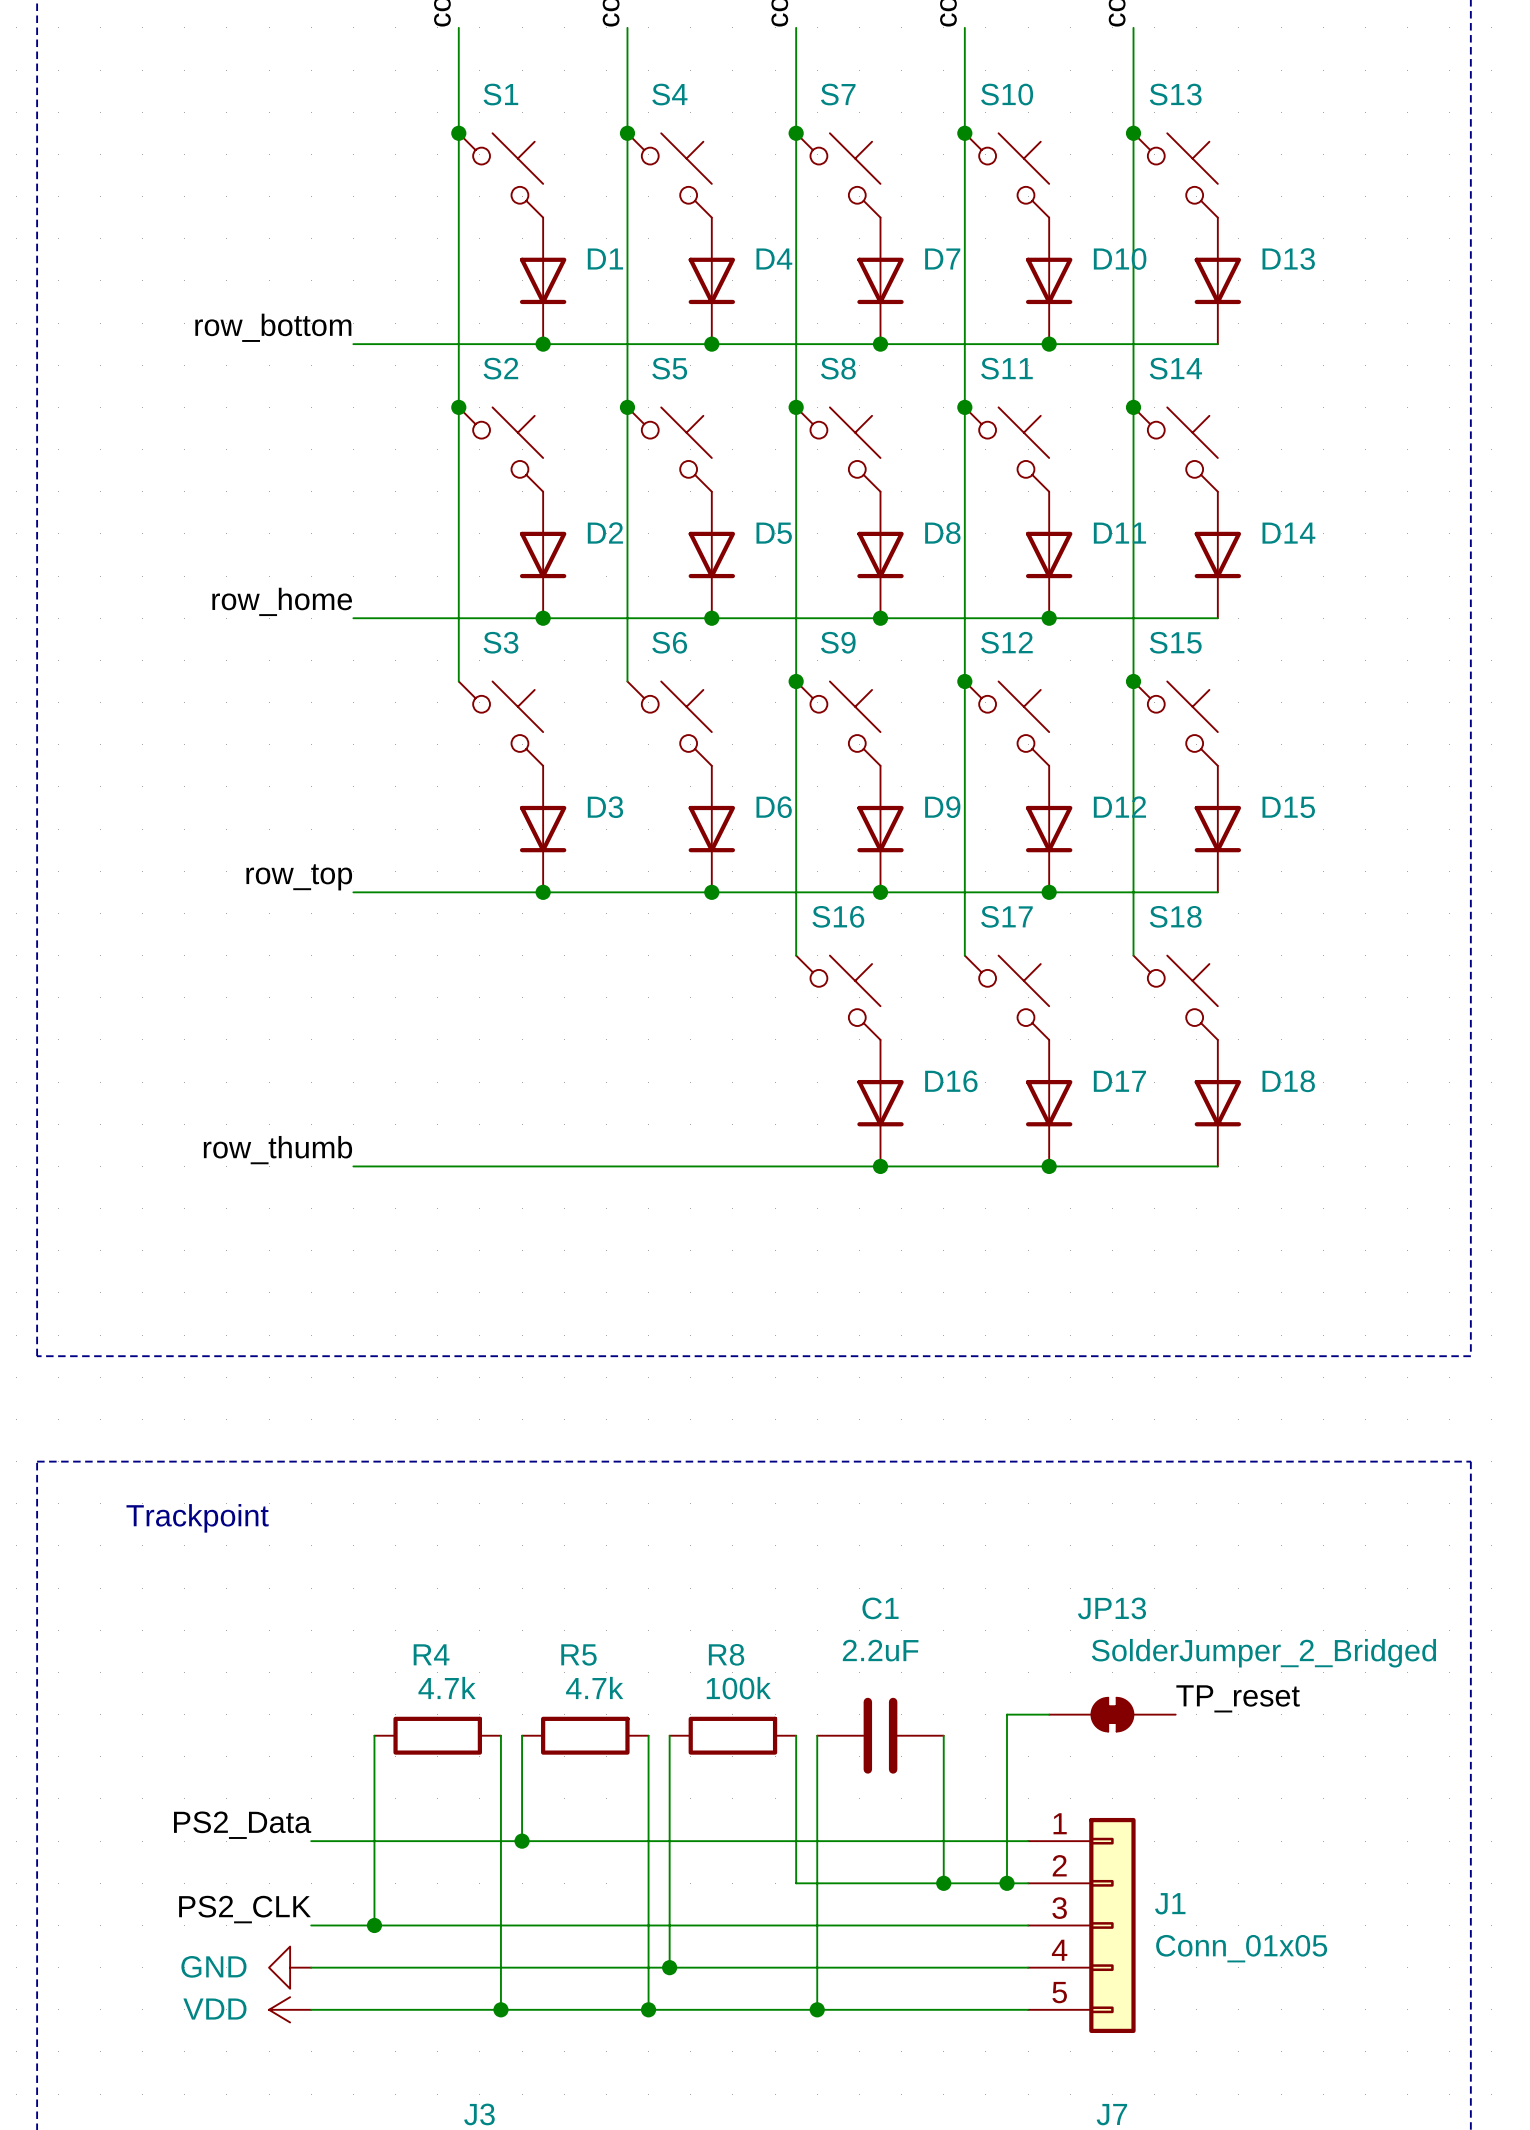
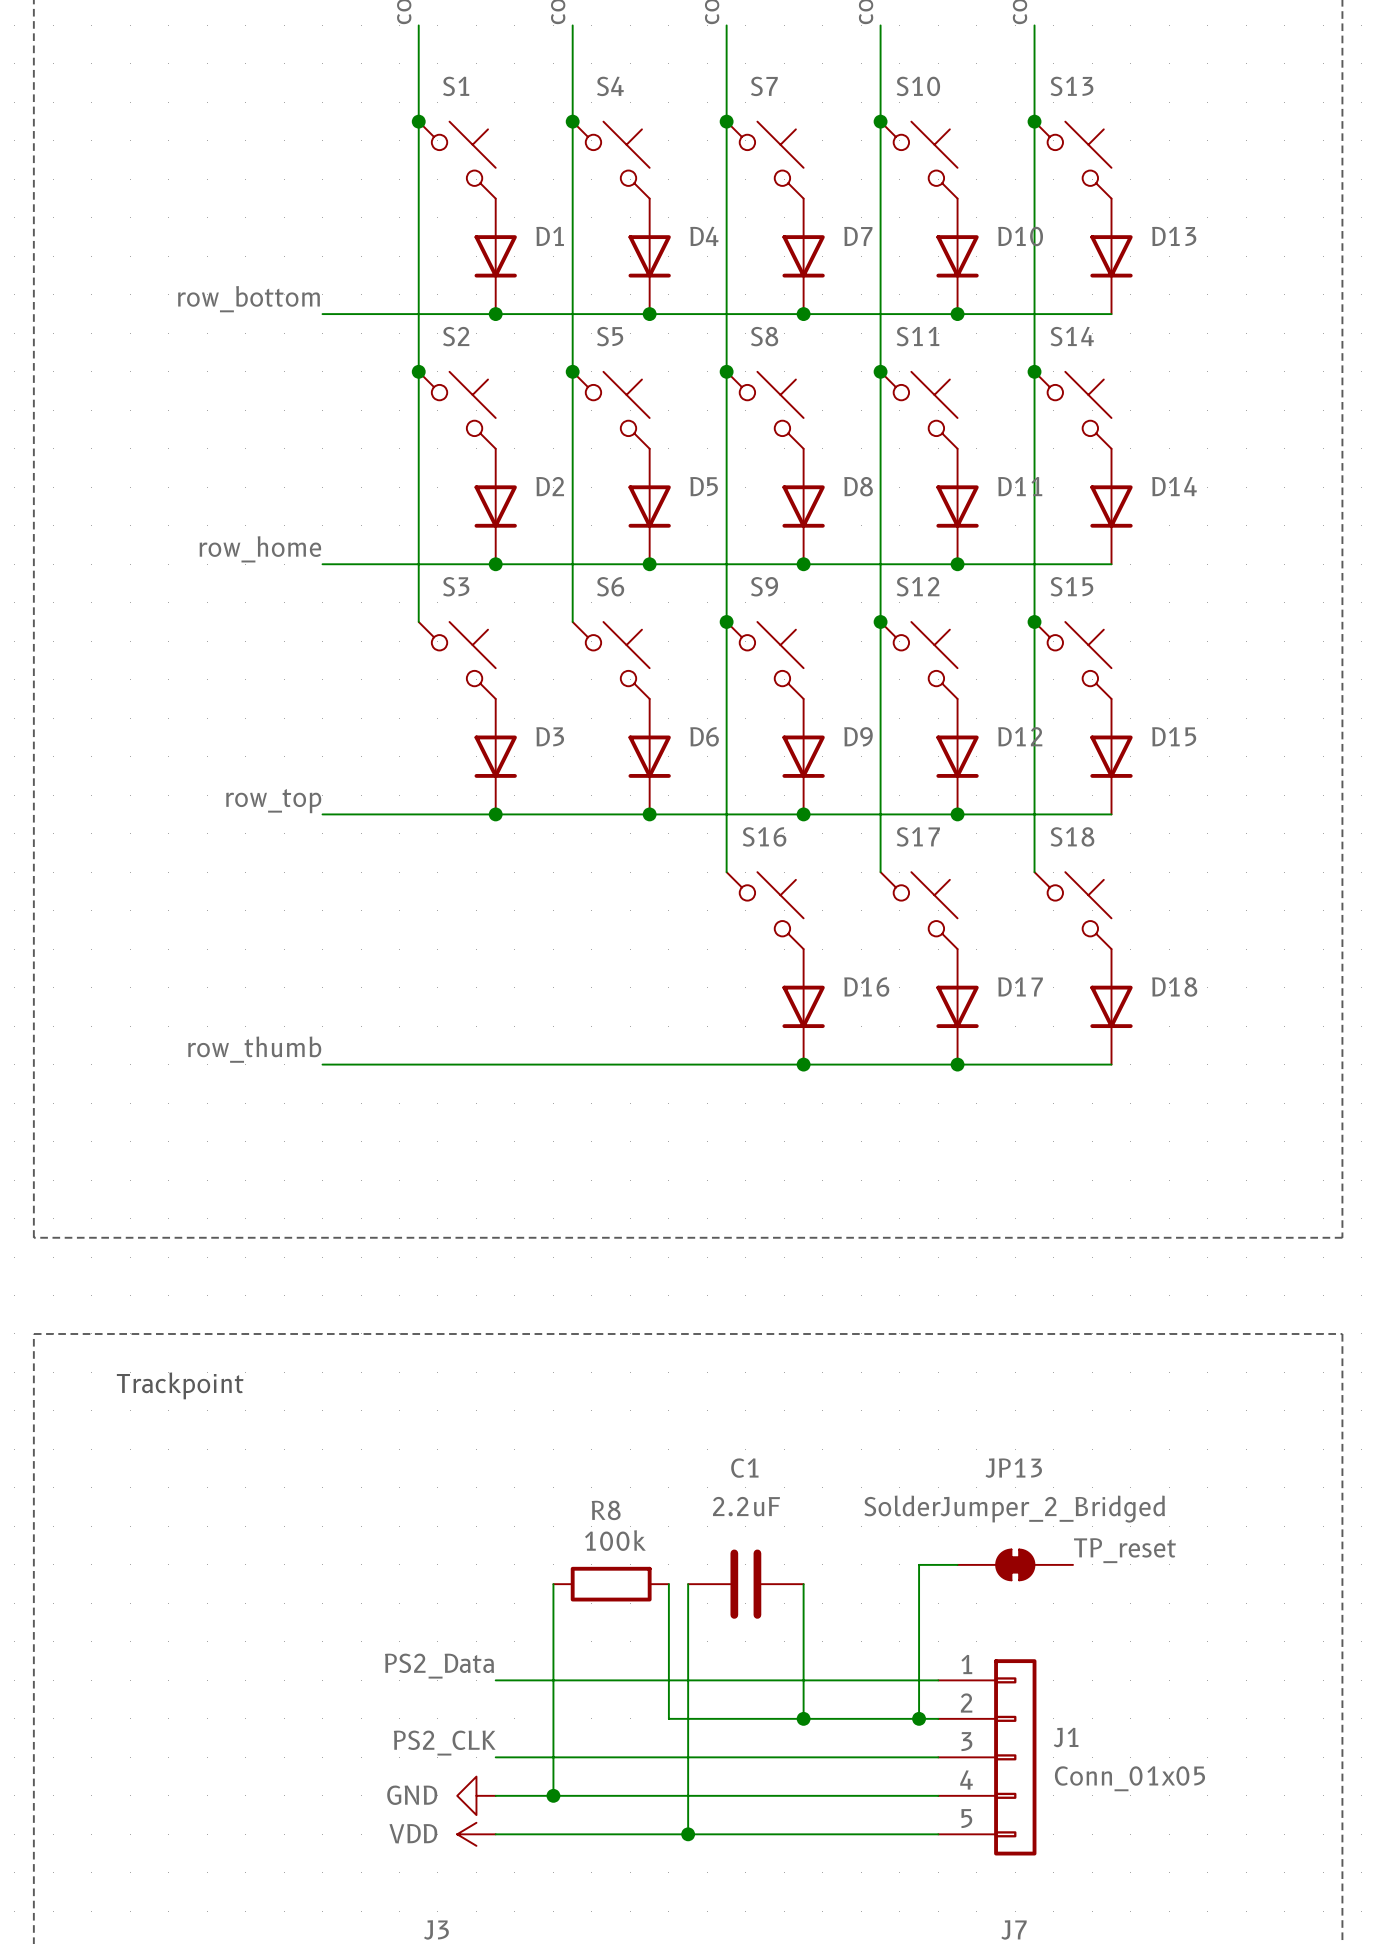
JP13 value position: SolderJumper_2_Bridged (1263, 1653) -> SolderJumper_2_Bridged (1014, 1509)
wire: (374, 1735) (374, 1925) -> none
R4: 4.7k (437, 1735) -> none
wire: (500, 1735) (500, 2009) -> none
wire: (522, 1735) (522, 1841) -> none
R5: 4.7k (585, 1735) -> none
wire: (648, 1735) (648, 2009) -> none
wire: (669, 1735) (669, 1967) -> (553, 1584) (553, 1795)
R8 position: (732, 1735) -> (611, 1584)
wire: (796, 1735) (796, 1883) -> (668, 1584) (668, 1718) (726, 1718)
wire: (817, 1735) (817, 2009) -> (688, 1584) (688, 1834)
C1 position: (880, 1735) -> (745, 1584)
wire: (943, 1735) (943, 1883) -> (803, 1584) (803, 1718)
label position: PS2_Data (242, 1825) -> PS2_Data (439, 1666)
wire: (311, 1841) (543, 1841) -> none
junction: (522, 1841) -> none
junction position: (943, 1883) -> (803, 1718)
label position: PS2_CLK (244, 1909) -> PS2_CLK (444, 1743)
wire: (311, 1925) (543, 1925) -> none
junction: (374, 1925) -> none
power symbol position: GND (290, 1967) -> GND (476, 1795)
wire: (311, 1967) (543, 1967) -> none
junction: none -> (553, 1795)
junction: (669, 1967) -> none
power symbol position: VDD (290, 2009) -> VDD (476, 1834)
wire: (311, 2009) (543, 2009) -> none
junction: (500, 2009) -> none
junction: (648, 2009) -> none
junction: none -> (688, 1834)
junction: (817, 2009) -> none

